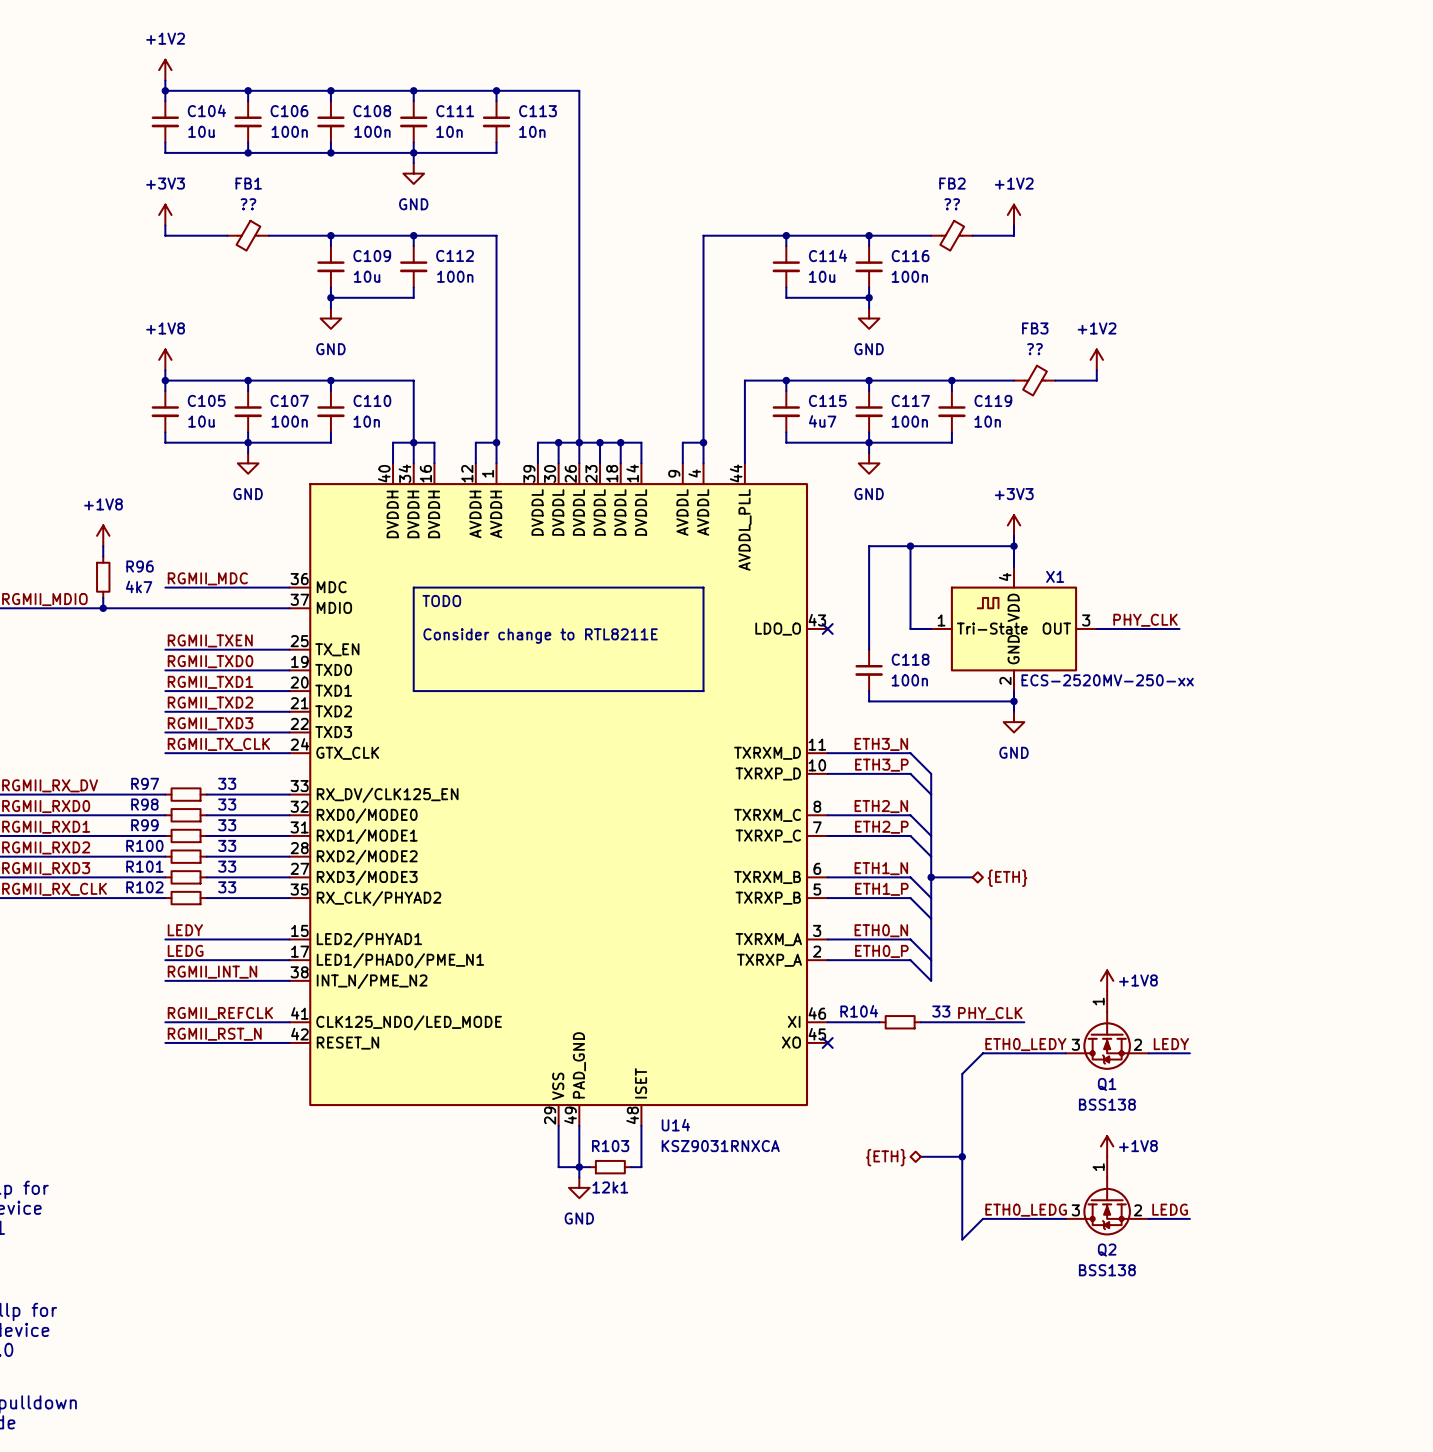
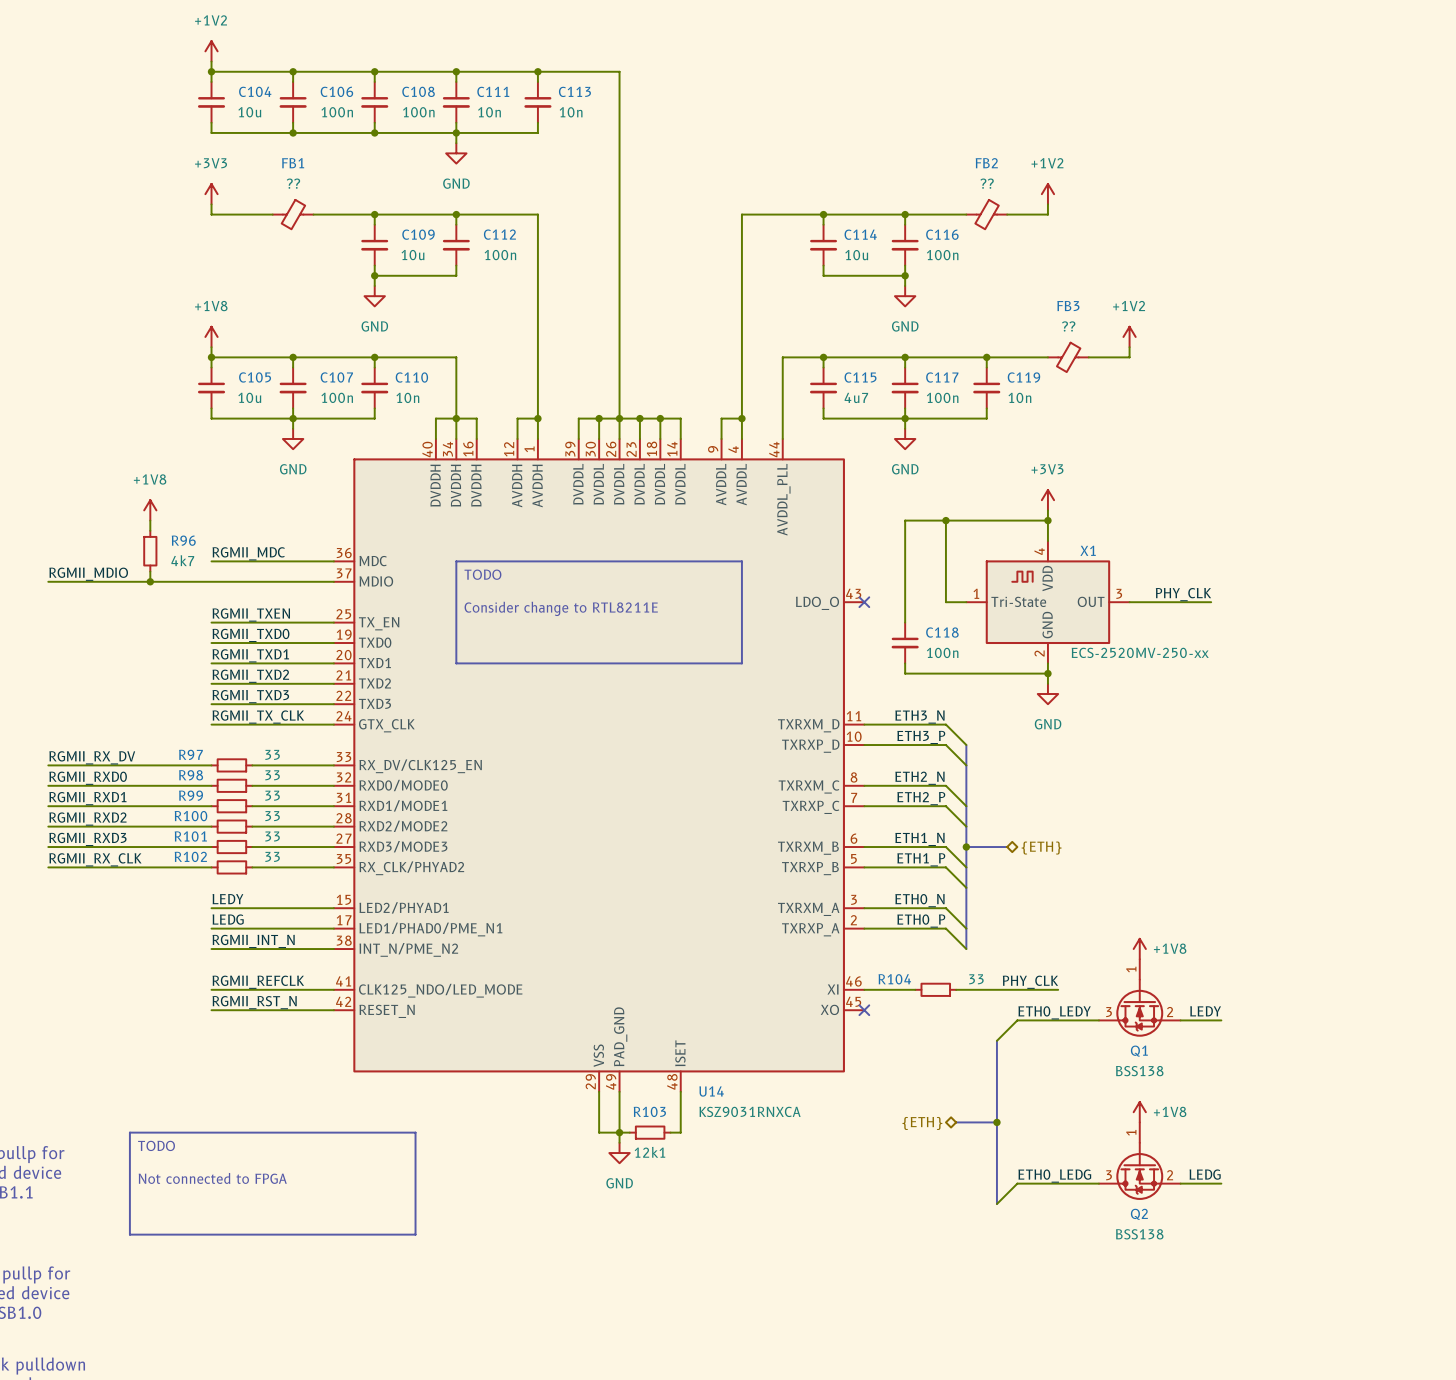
line: none -> (129, 1132) (415, 1132) (415, 1234) (129, 1234) (129, 1132)
text: none -> TODO (156, 1145)
text: none -> Not connected to FPGA (212, 1178)

